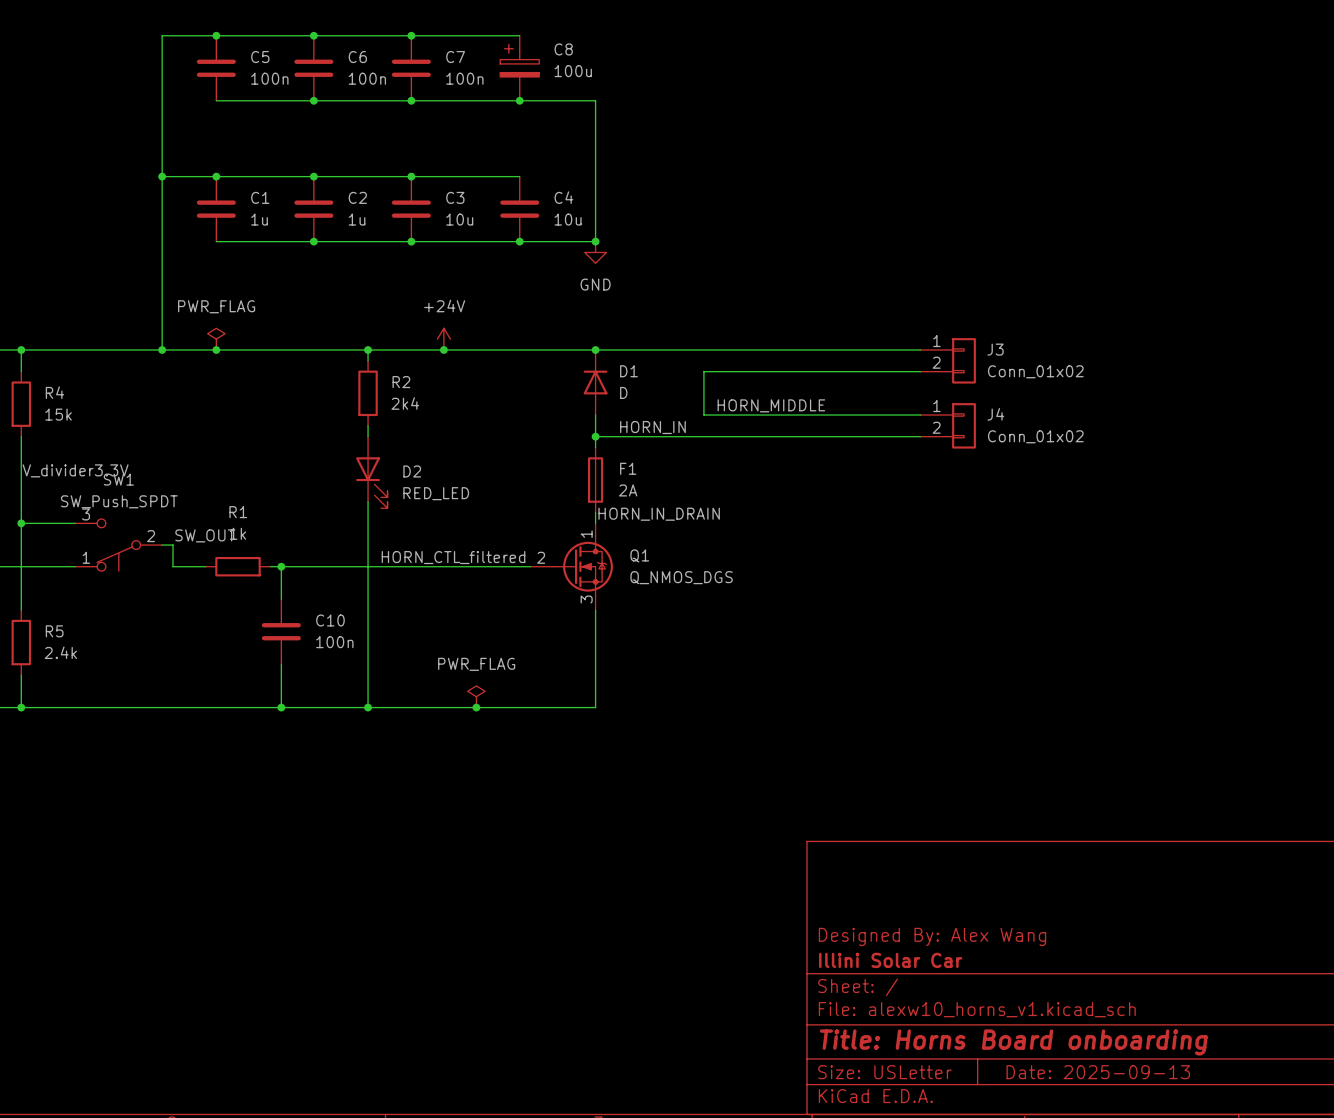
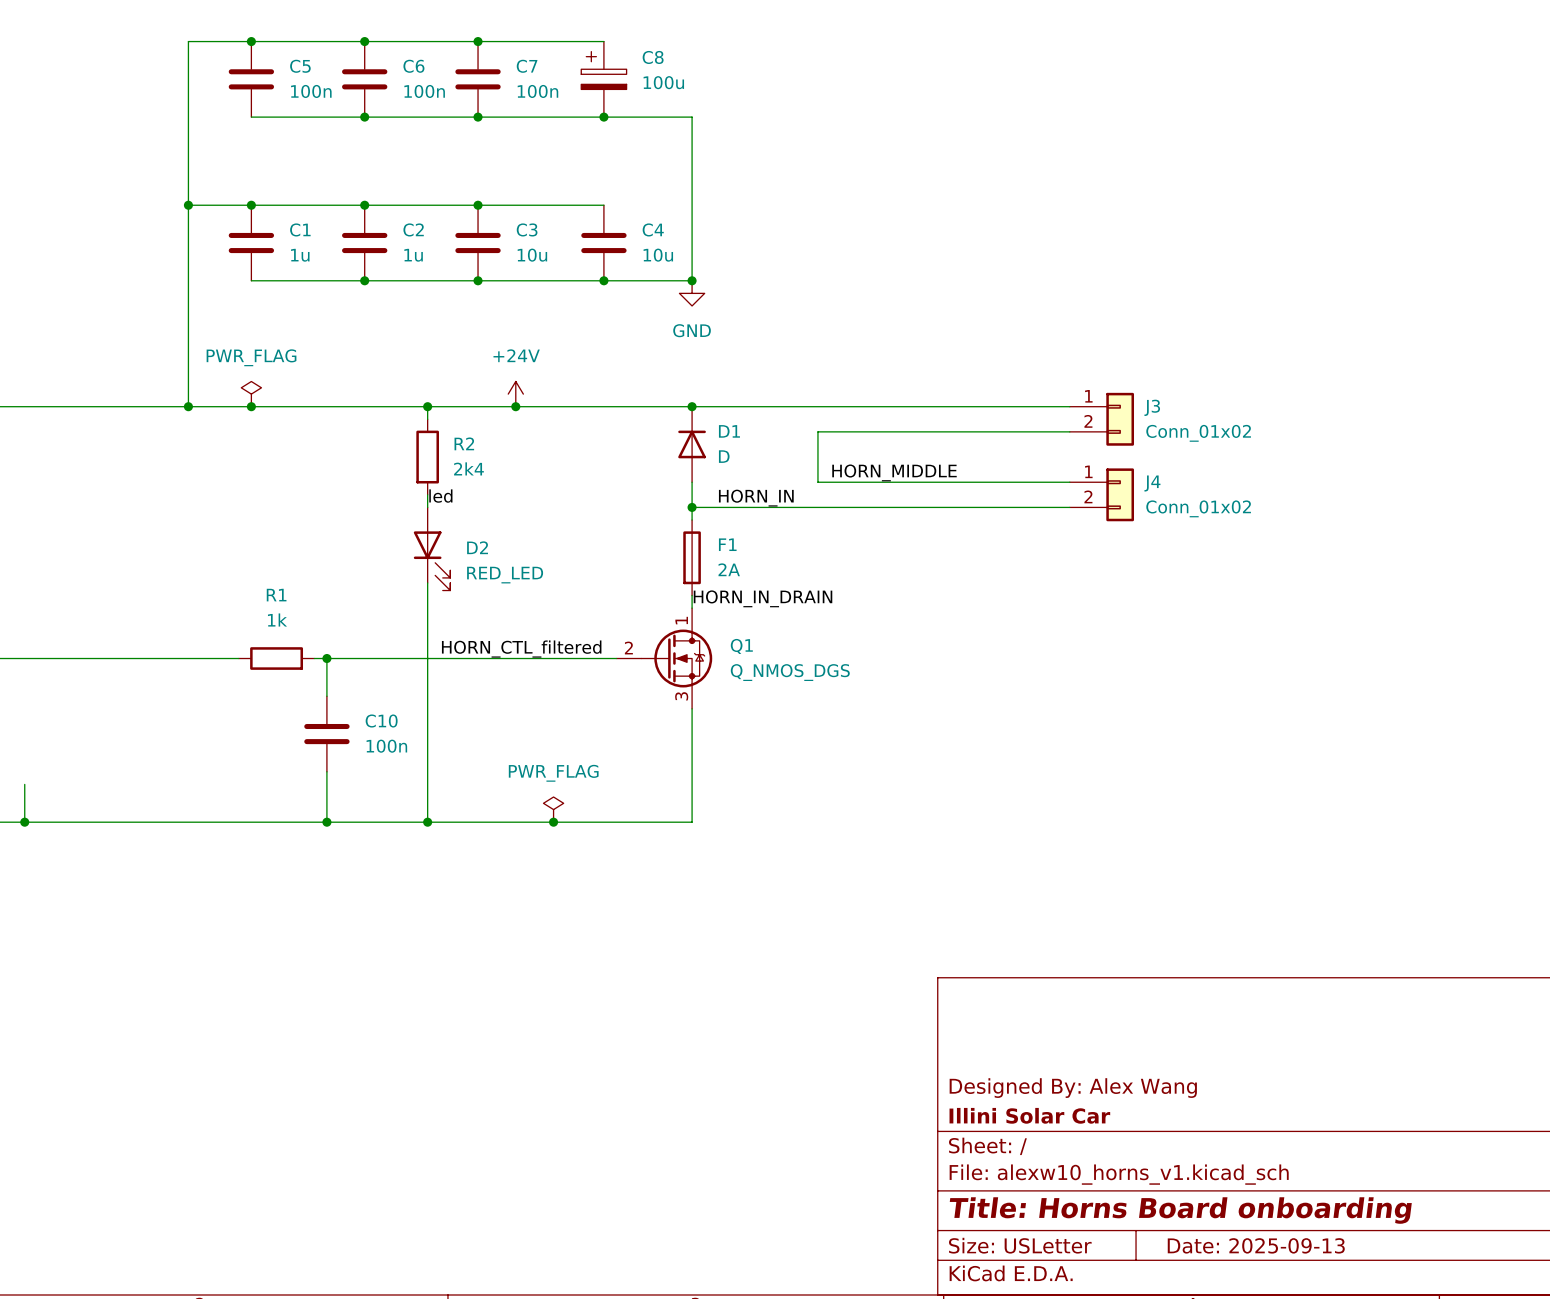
wire: (21, 350) (21, 371) -> none
junction: (21, 350) -> none
R4: 15k (21, 404) -> none
label: none -> led (440, 496)
wire: (21, 436) (21, 610) -> none
label: V_divider3.3V (75, 470) -> none
wire: (21, 523) (75, 523) -> none
junction: (21, 523) -> none
label: SW_OUT (205, 535) -> none
SW1: SW_Push_SPDT (118, 545) -> none
wire: (162, 545) (172, 545) (172, 566) -> (87, 658) (201, 658)
R5: 2.4k (21, 642) -> none

